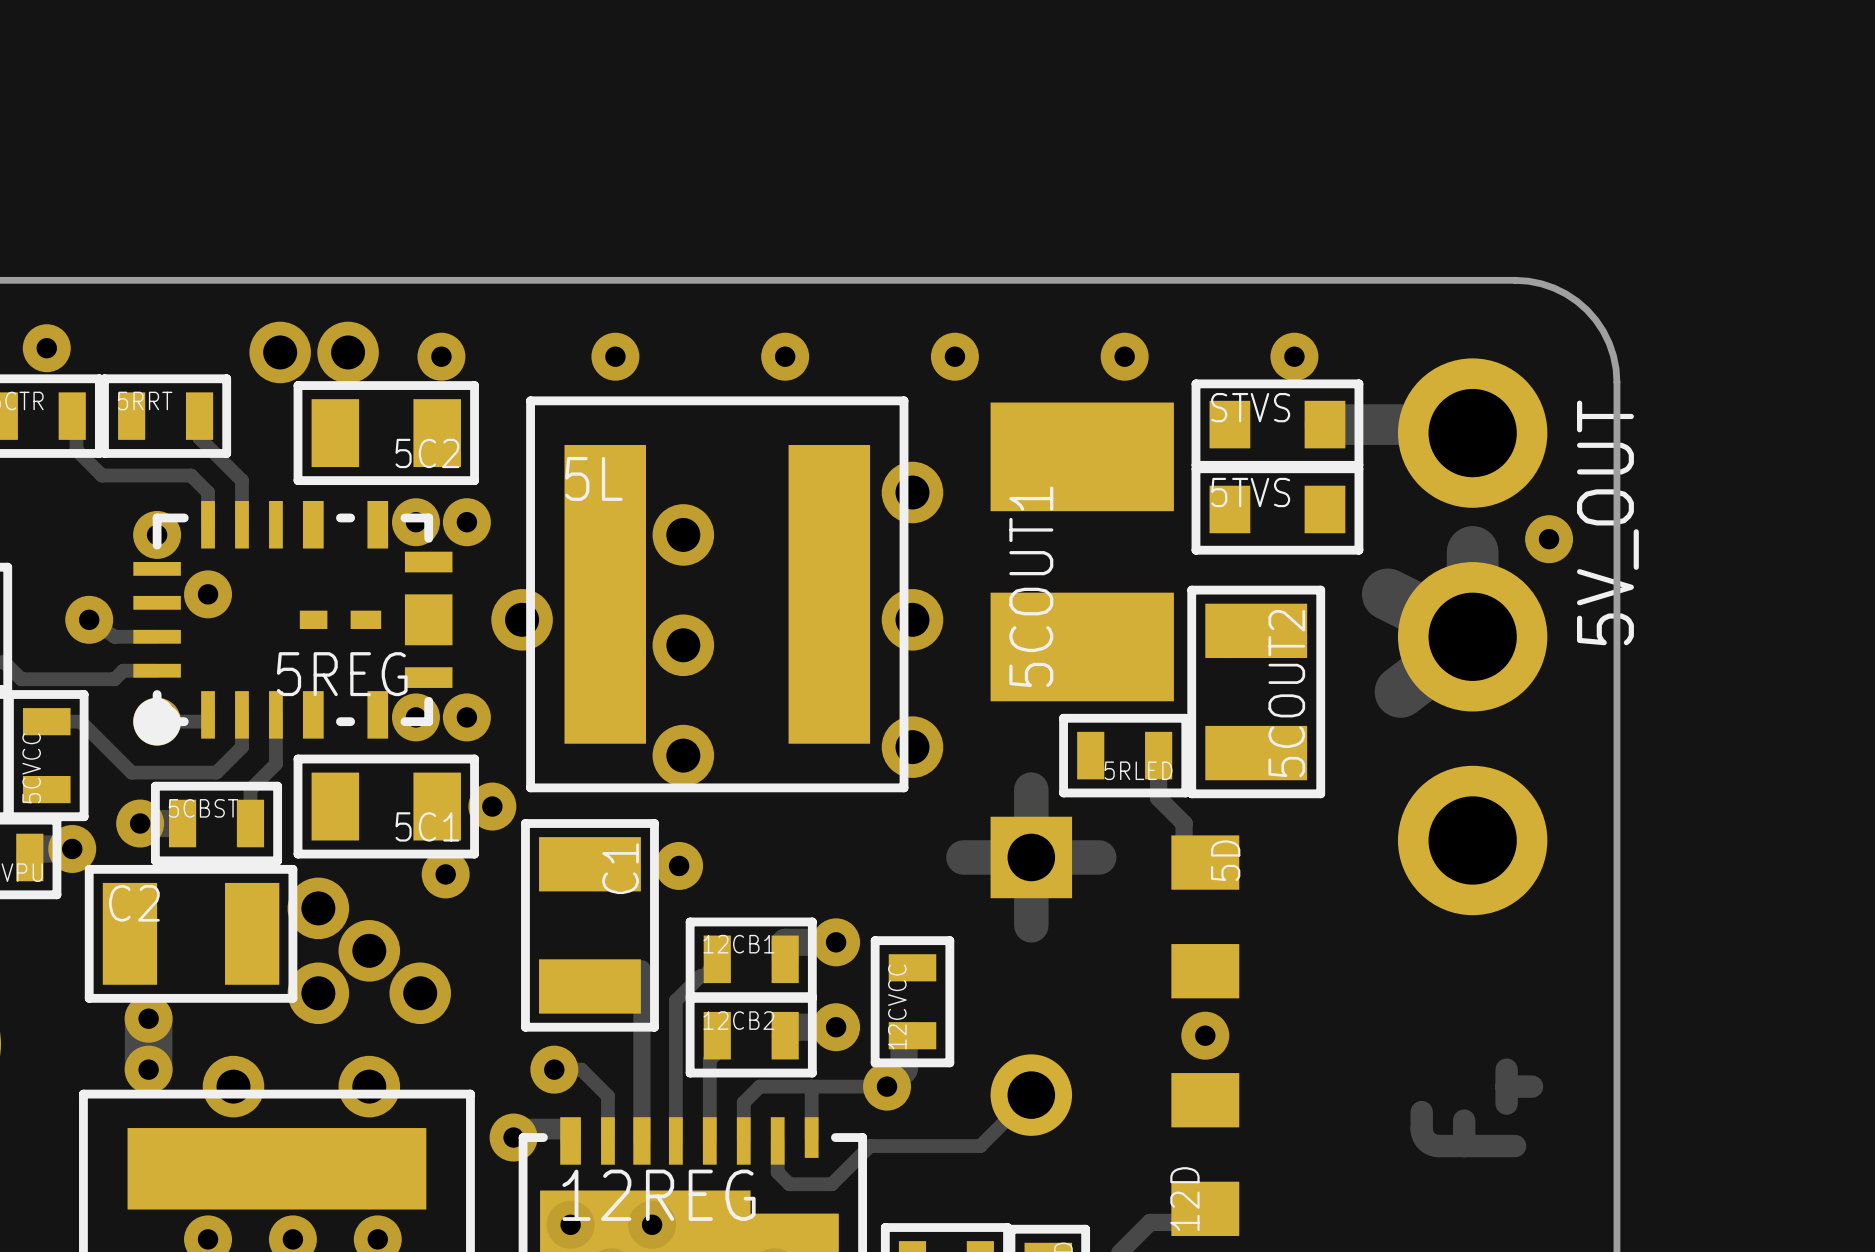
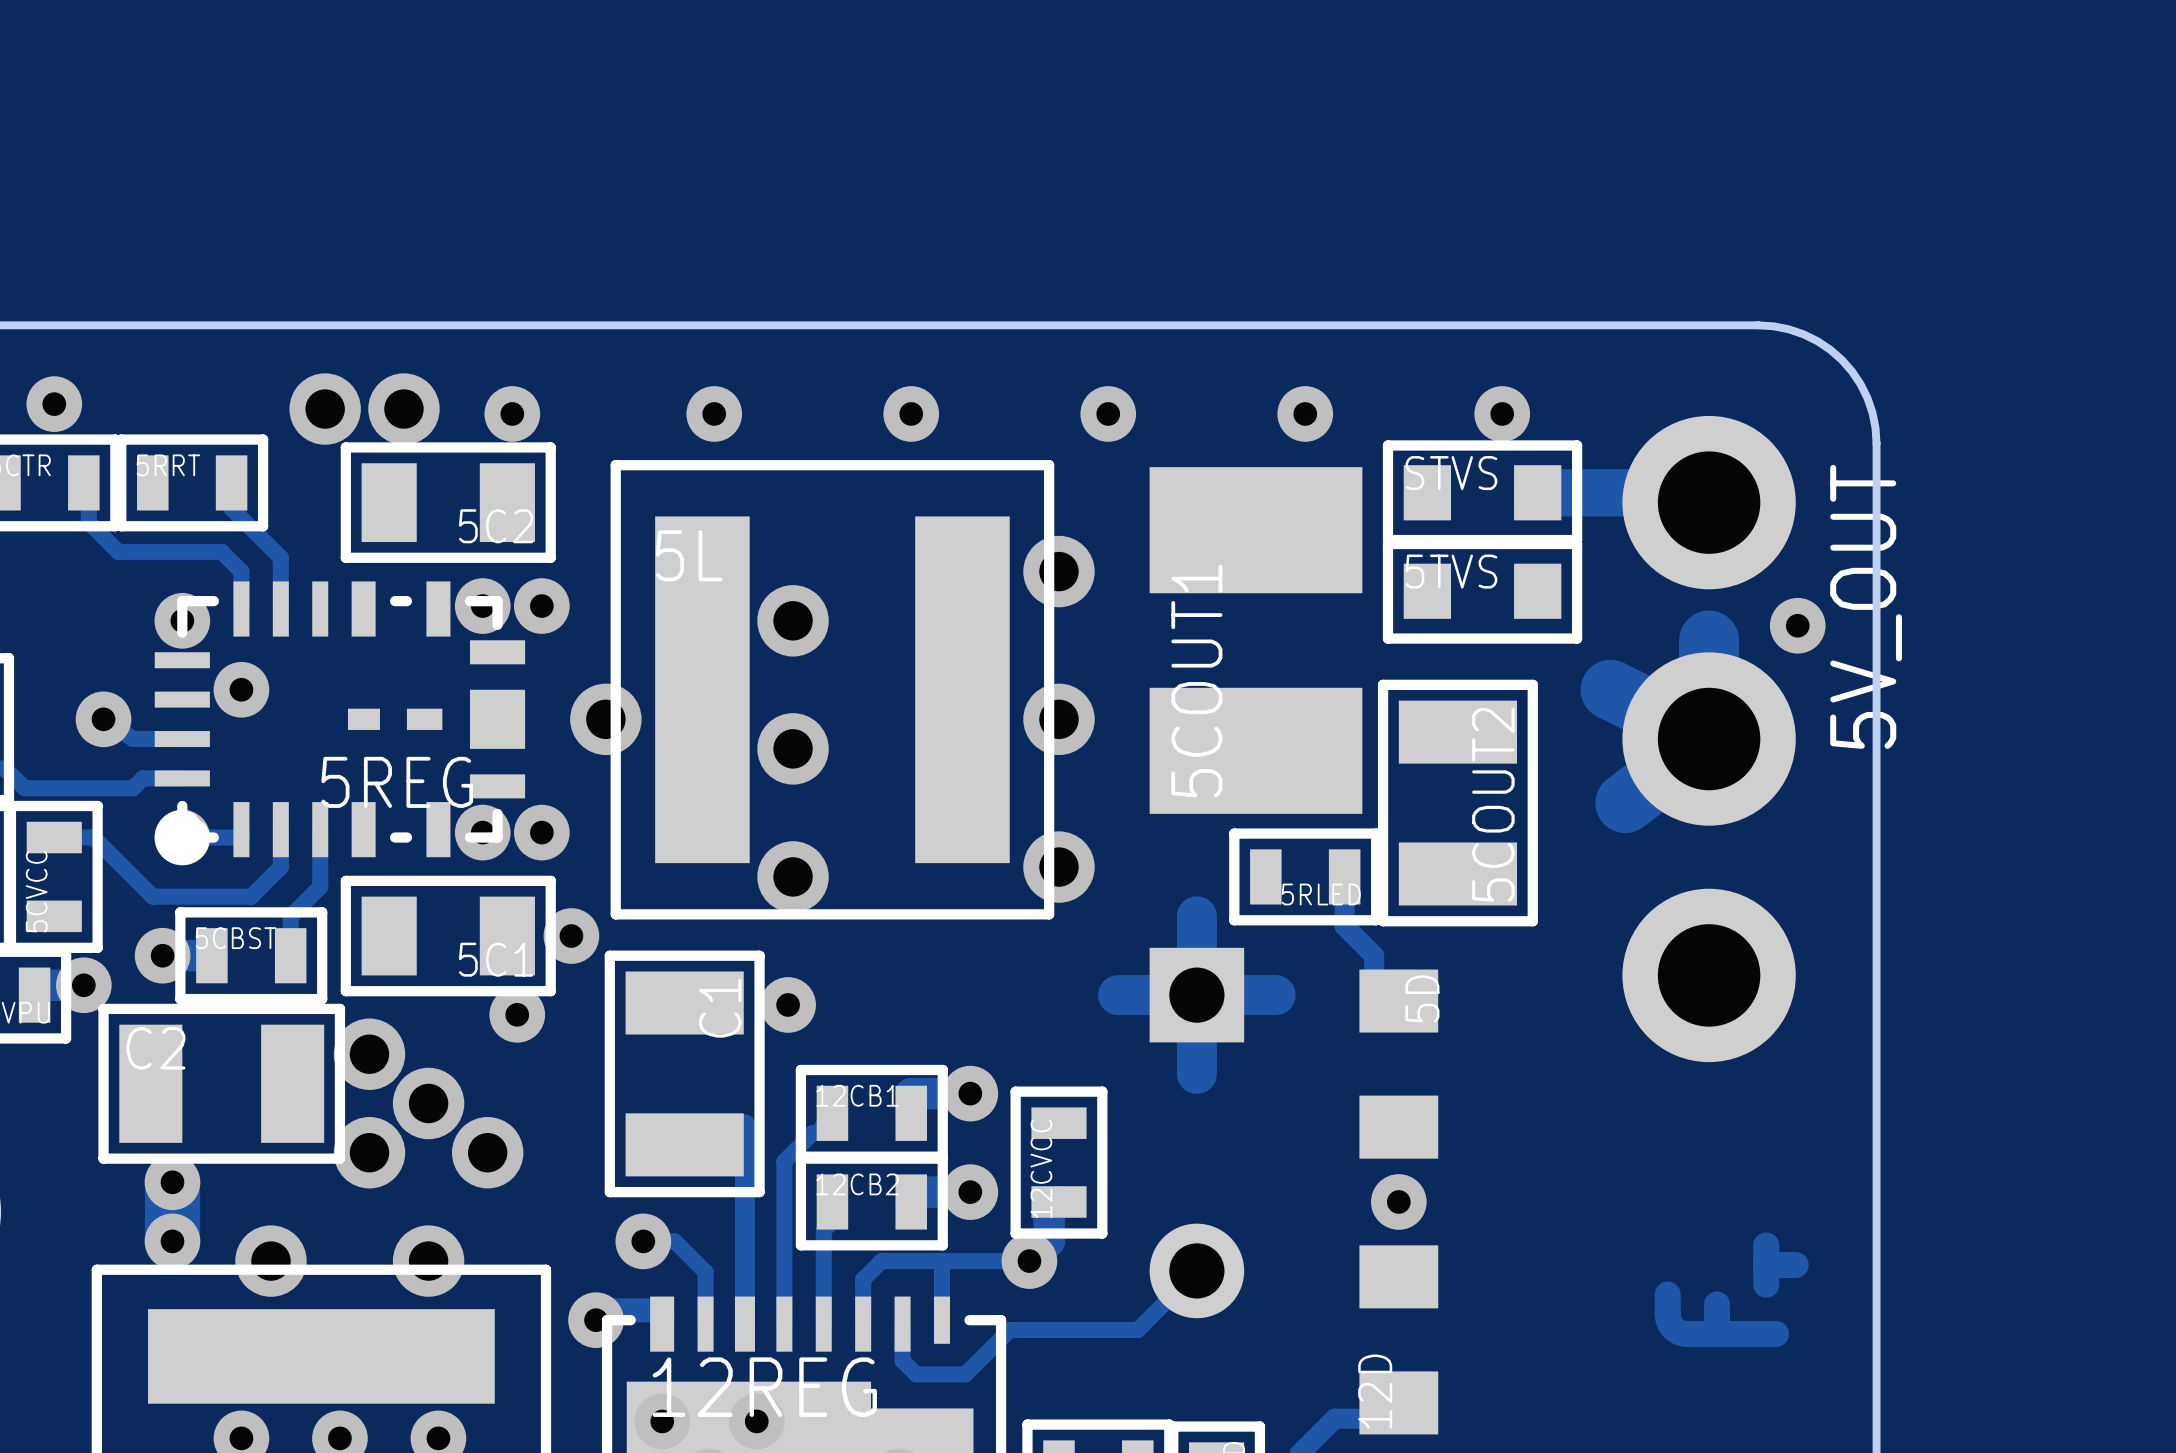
drawing: none -> [1654, 1232, 1809, 1347]
track: (1506, 1069) (1506, 1103) -> none
track: (1506, 1086) (1532, 1086) -> none
track: (1421, 1112) (1422, 1133) (1425, 1139) (1432, 1144) (1515, 1146) -> none
track: (1464, 1120) (1464, 1146) -> none

